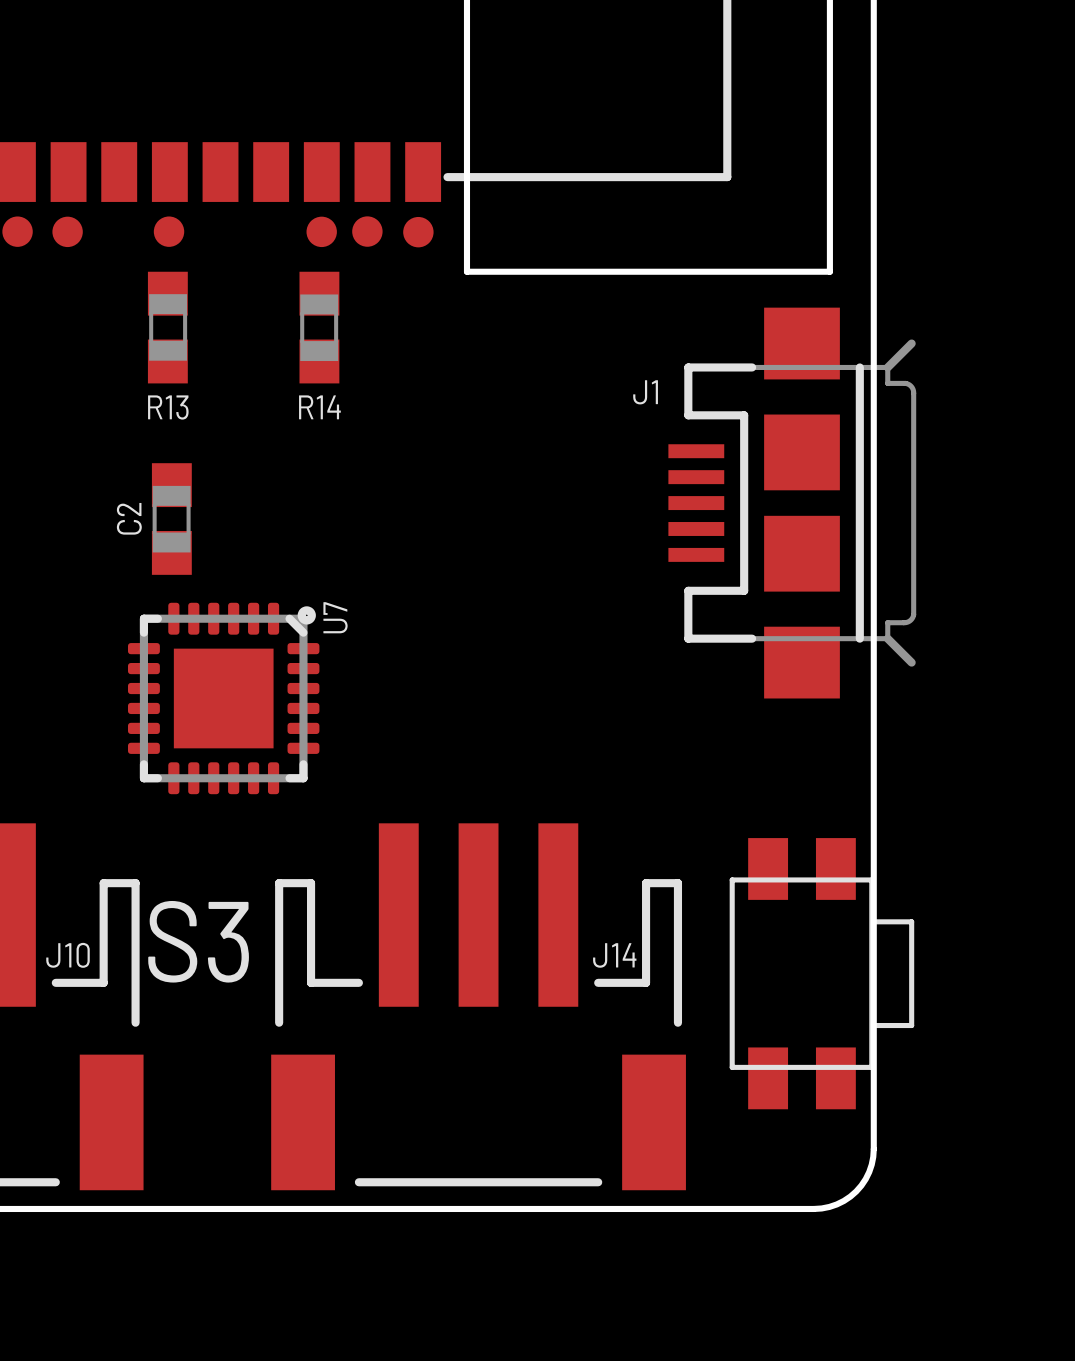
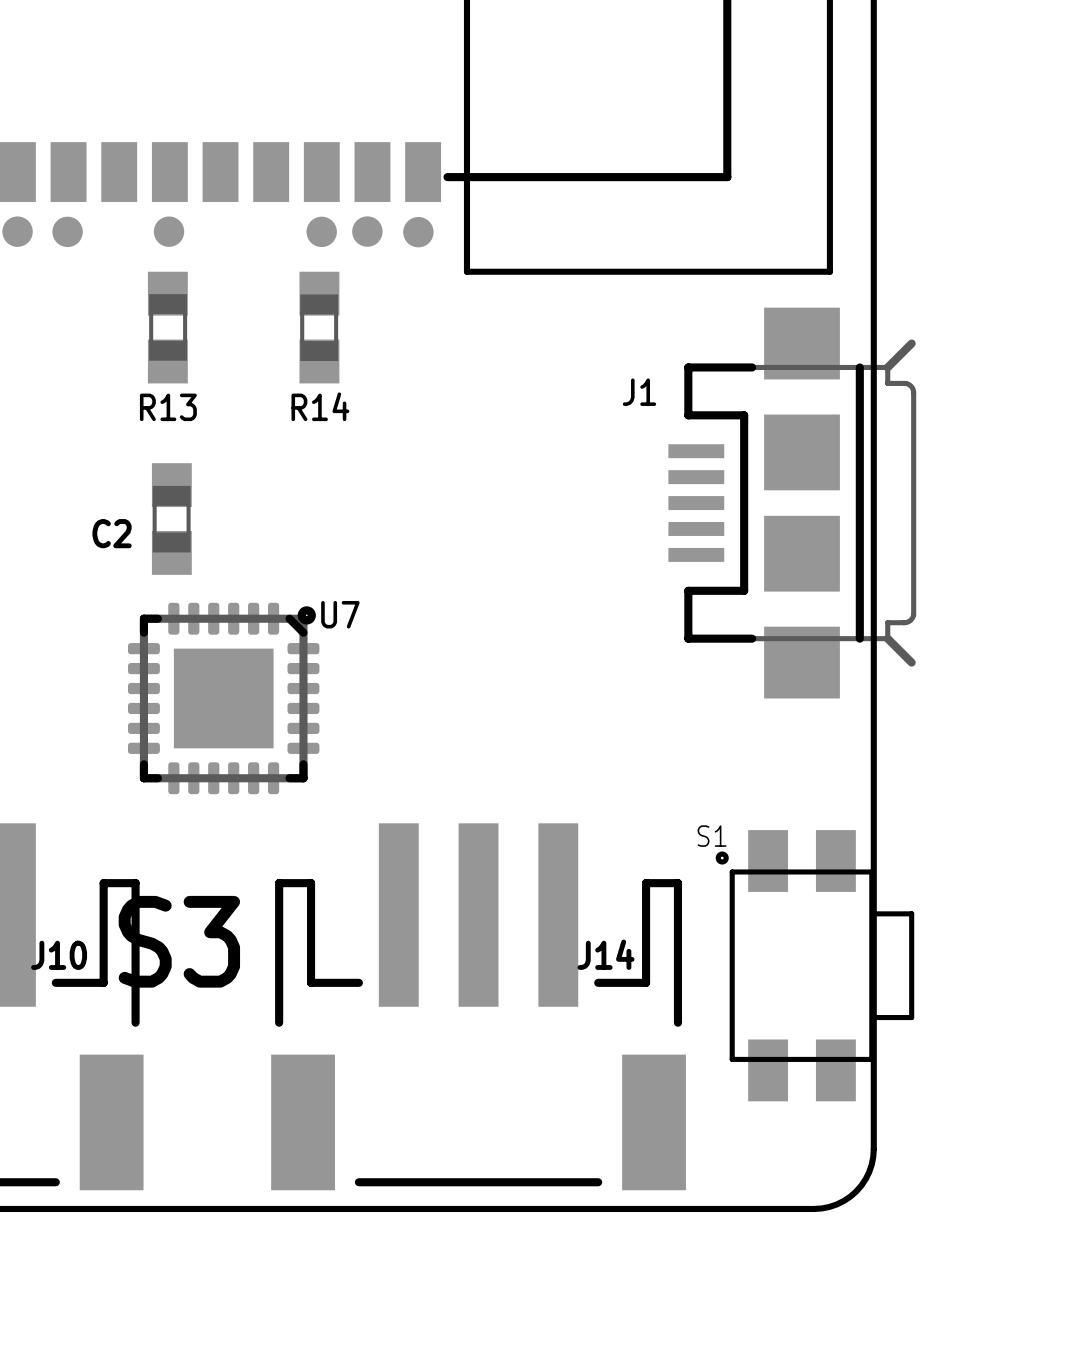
C2 name rotation: 0° (129, 518) -> 90° clockwise (112, 533)
U7 name rotation: 0° (335, 617) -> 90° clockwise (340, 614)
text: none -> S1 (712, 836)
part footprint: [729, 838, 915, 1110] -> [715, 830, 915, 1102]

